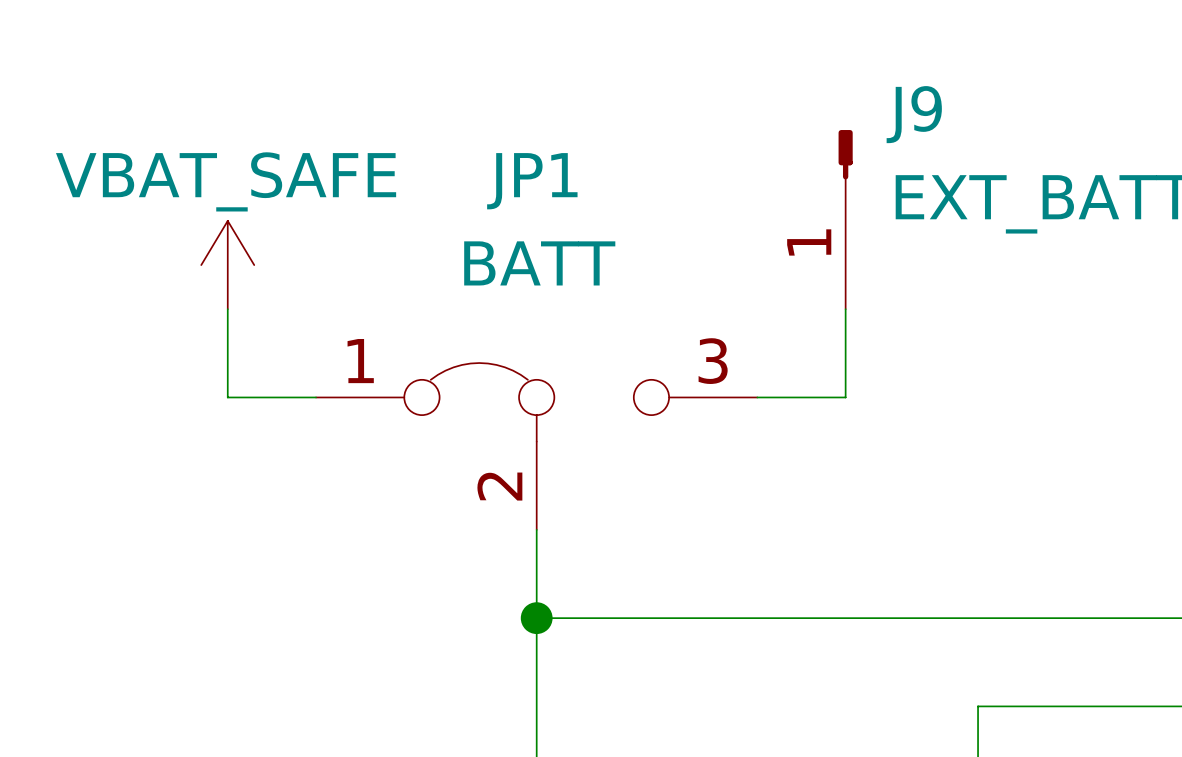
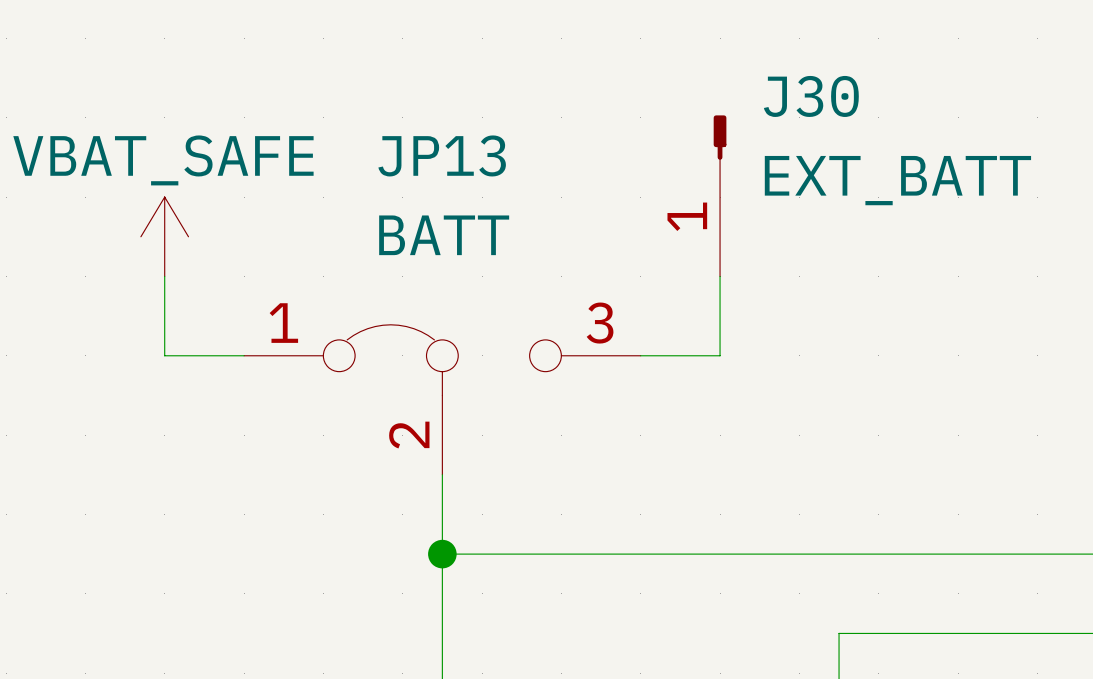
J9 name: J9 (914, 114) -> J30 (811, 96)
JP1 name: JP1 (532, 181) -> JP13 (442, 155)

